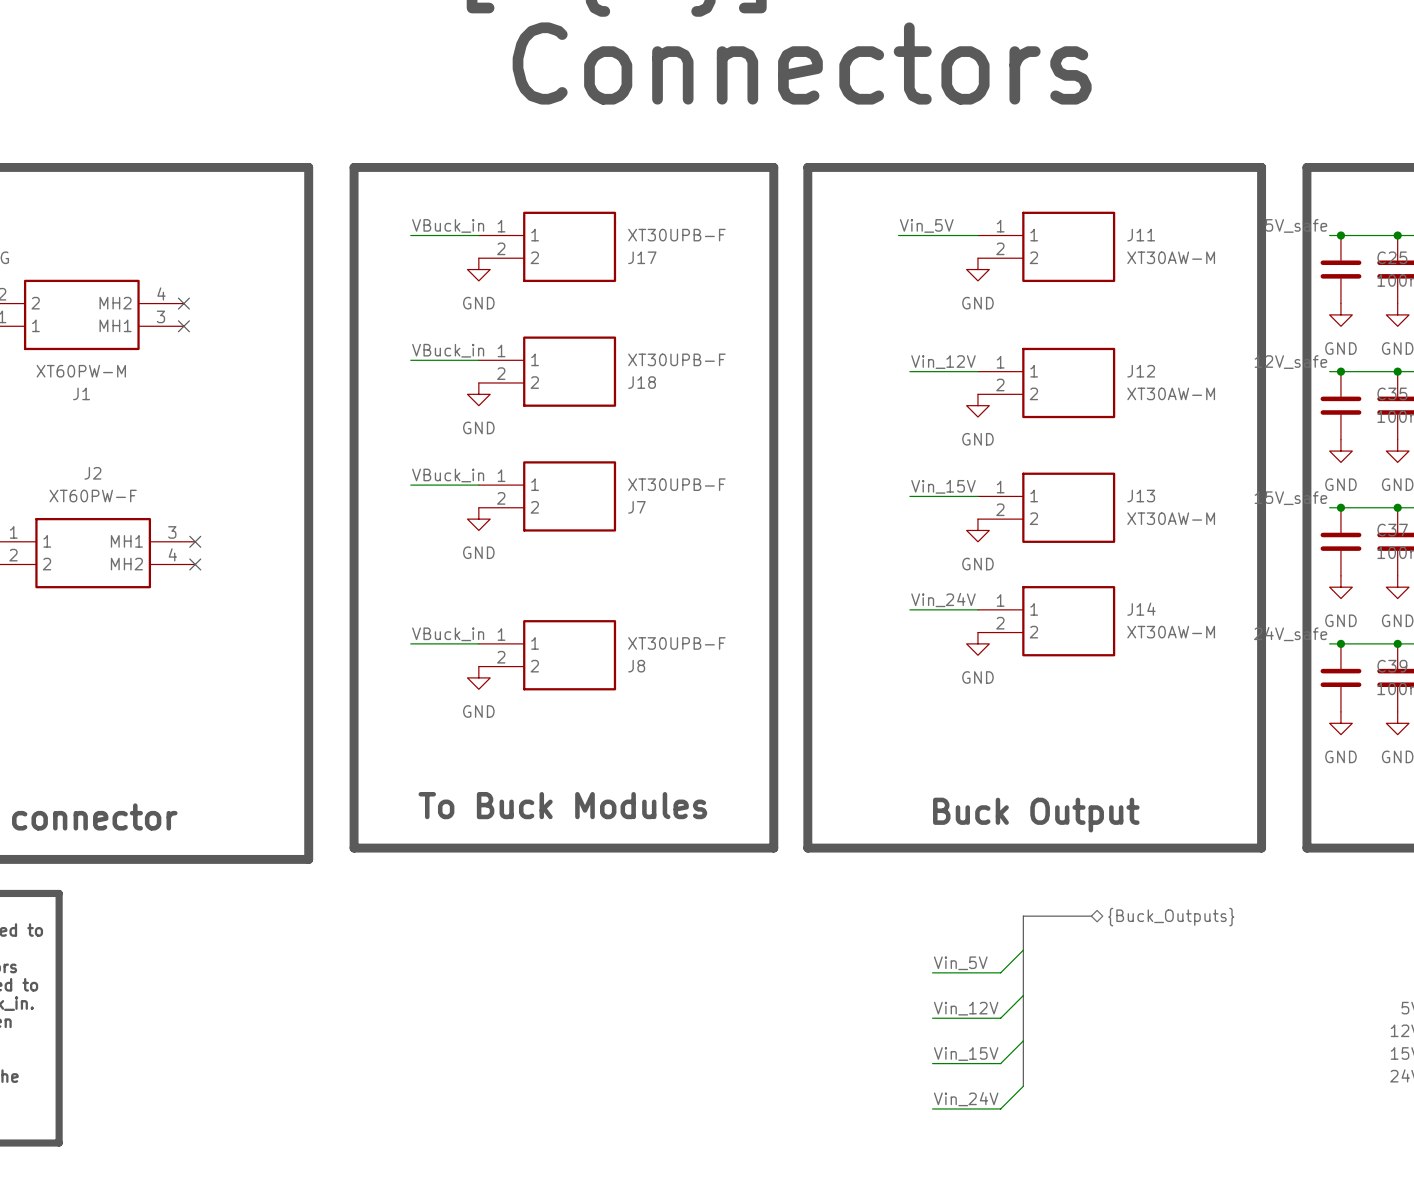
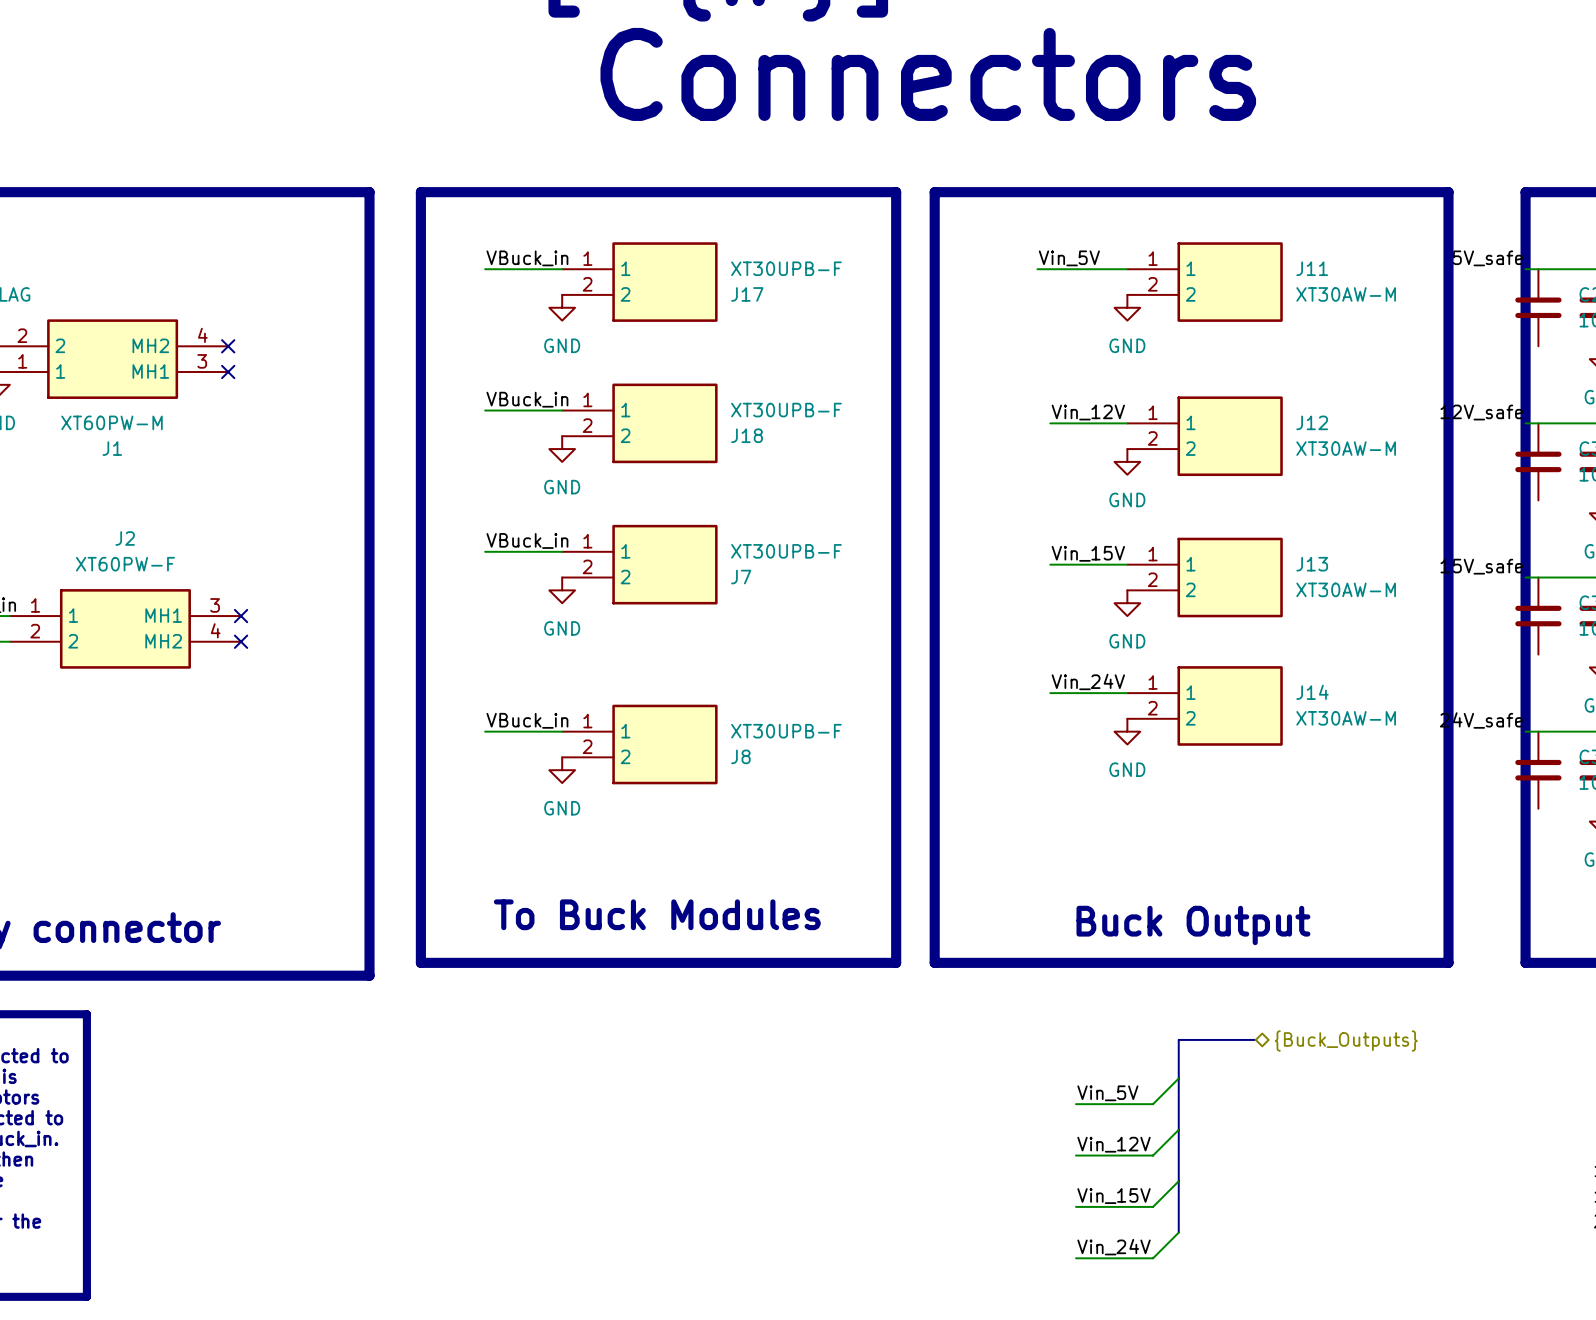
line: (1329, 167) (1306, 167) (1306, 848) (1329, 848) -> (1525, 192) (1525, 962)
junction: (1340, 235) -> none
power symbol: GND (1340, 314) -> none
junction: (1340, 371) -> none
power symbol: GND (1340, 451) -> none
junction: (1340, 507) -> none
power symbol: GND (1340, 587) -> none
junction: (1340, 643) -> none
power symbol: GND (1340, 723) -> none

